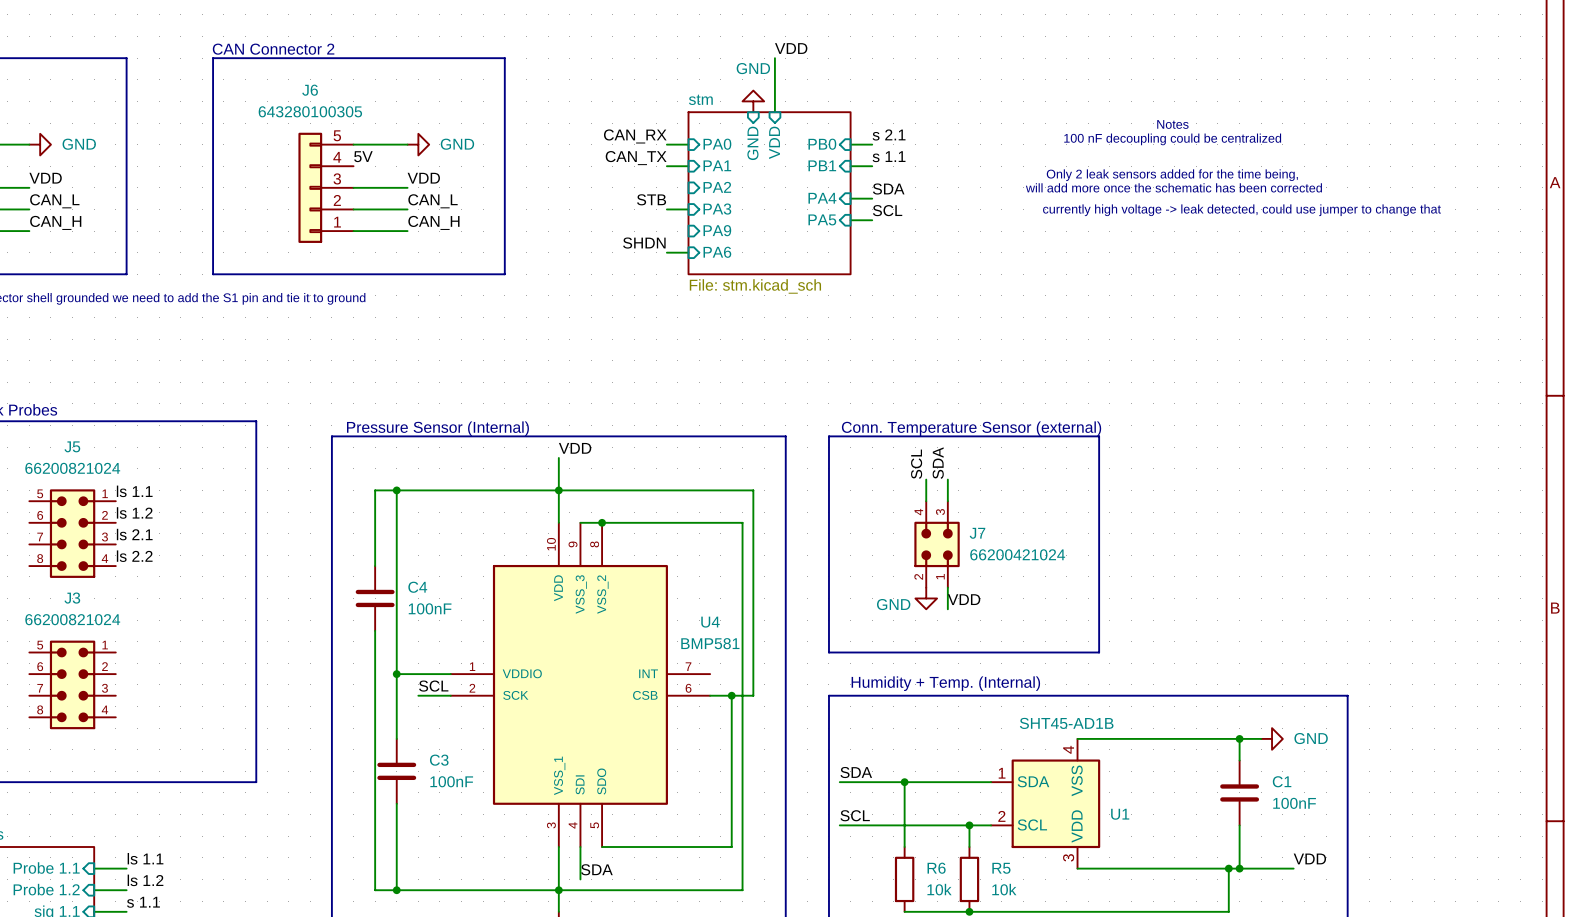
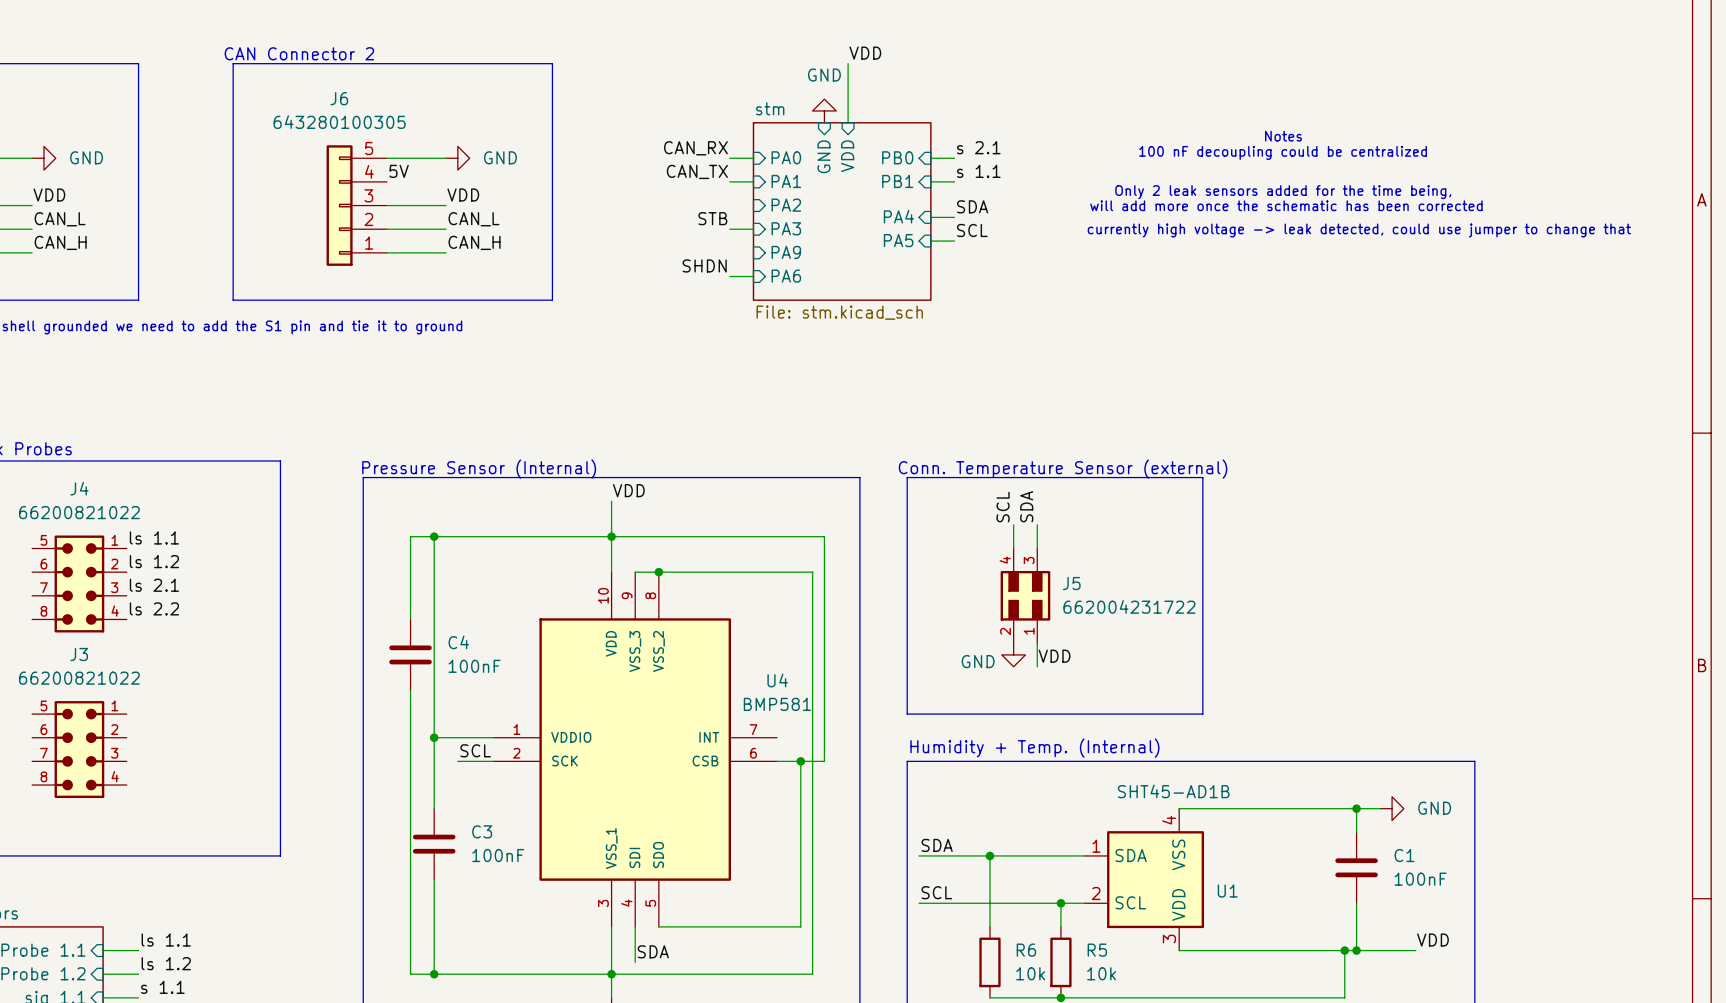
J5 name: J5 (72, 446) -> J4 (79, 488)
J5 value: 66200821024 (72, 468) -> 66200821022 (79, 512)
J7: 66200421024 (937, 544) -> none
J5: none -> 662004231722 (1025, 595)
J3 value: 66200821024 (72, 619) -> 66200821022 (79, 678)

